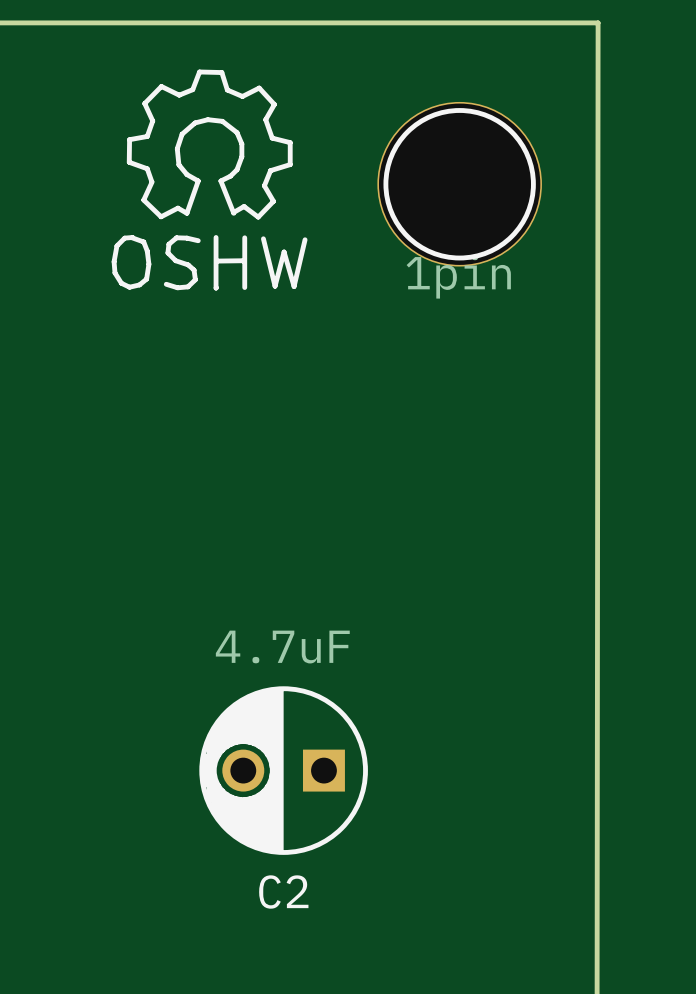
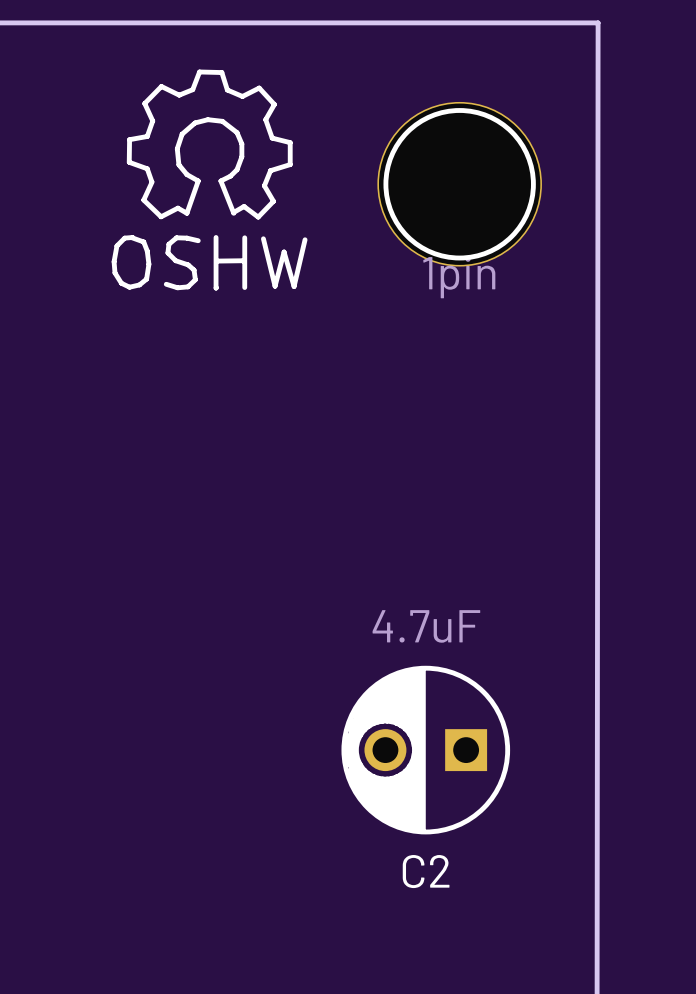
C2 position: (283, 770) -> (425, 750)

